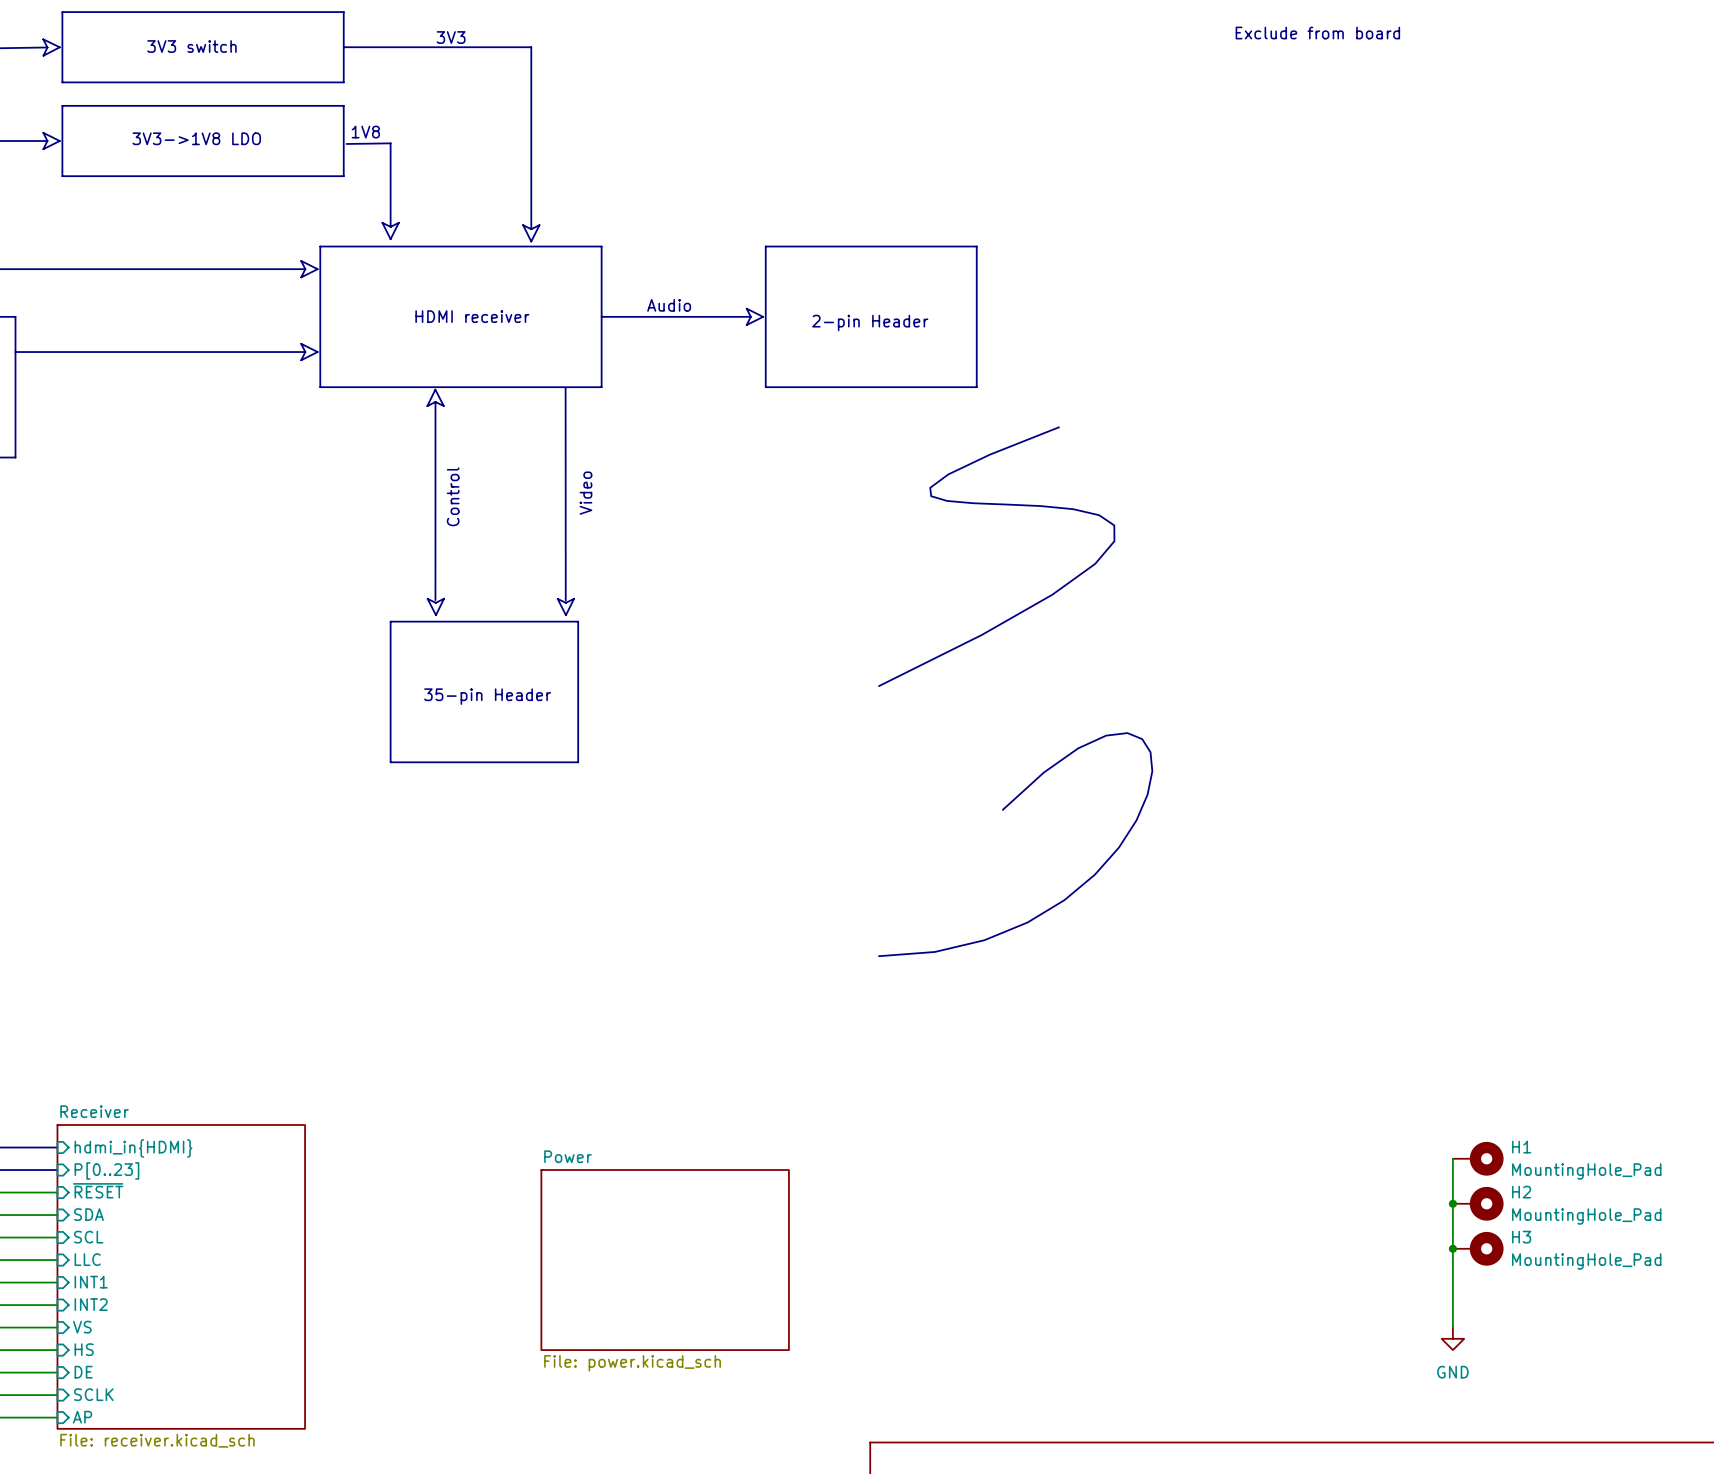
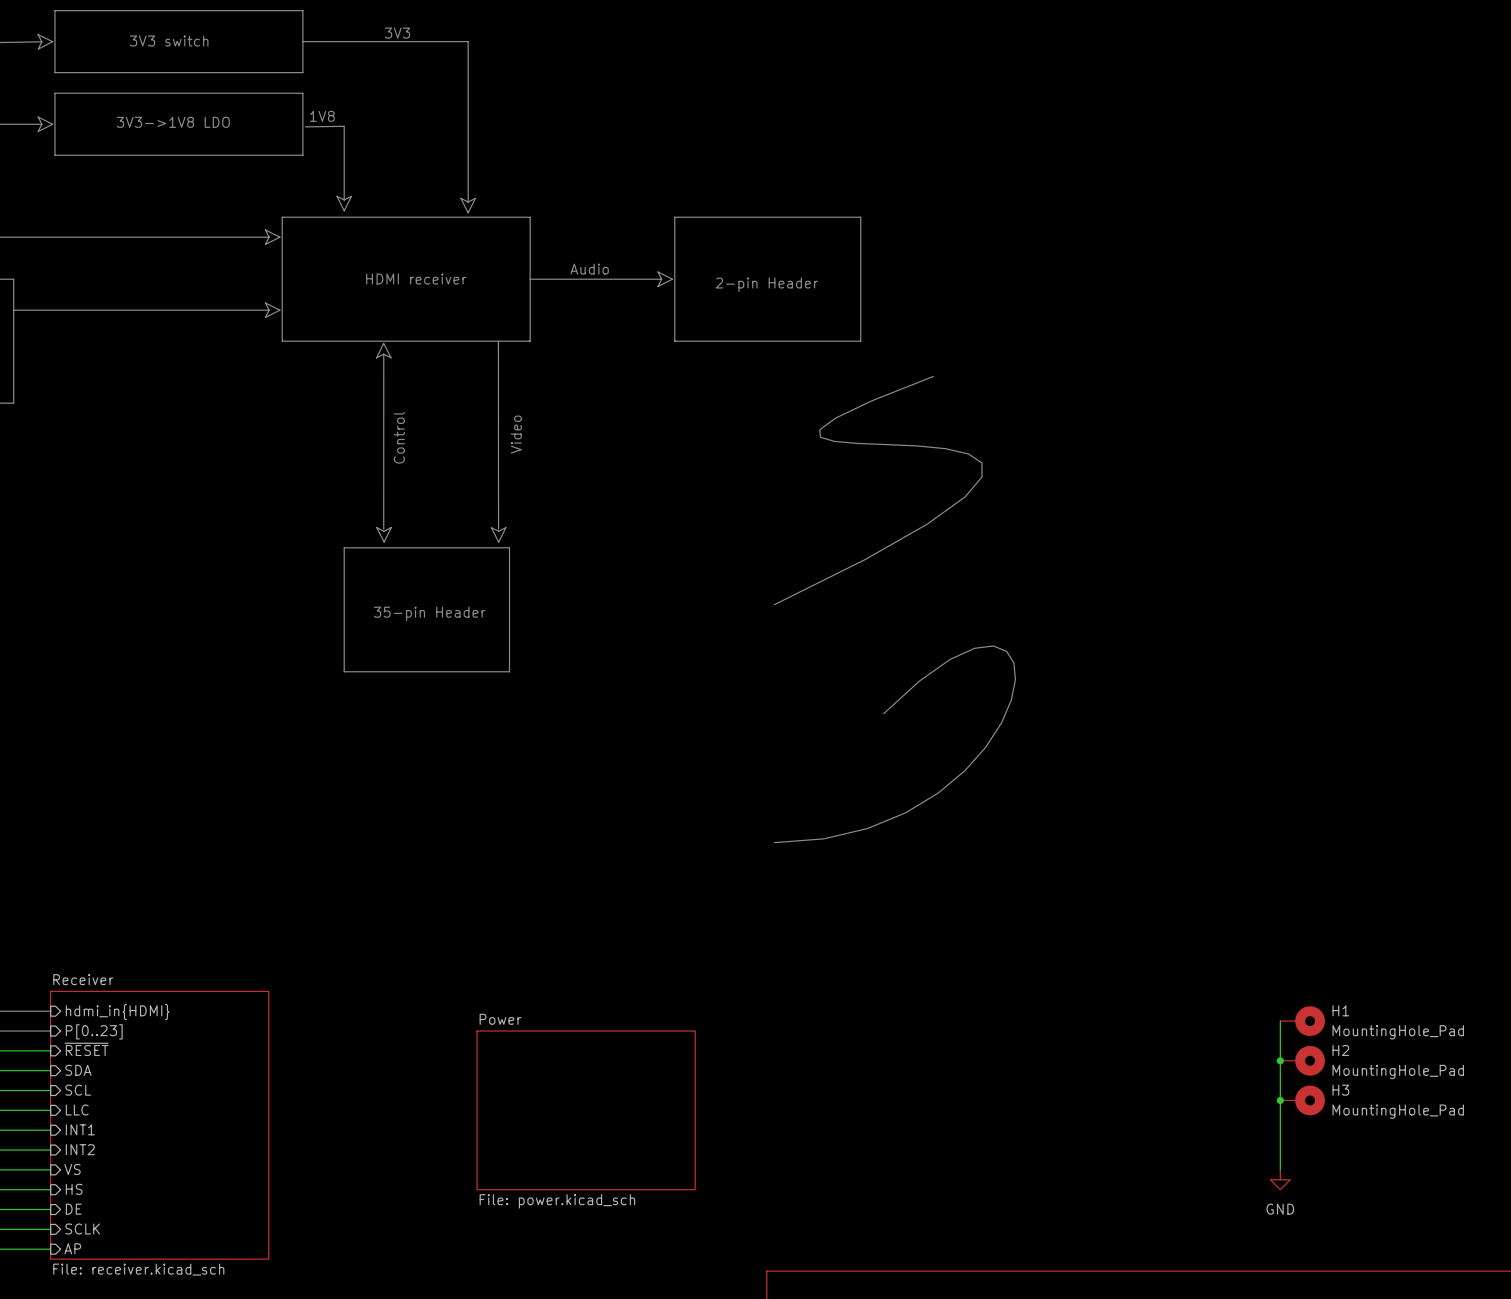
text: Exclude from board (1317, 33) -> none

